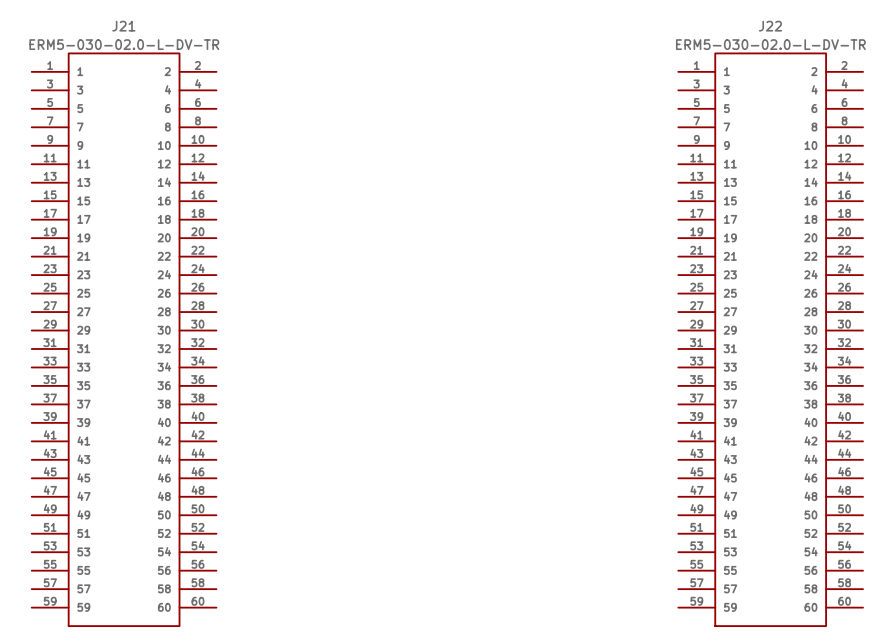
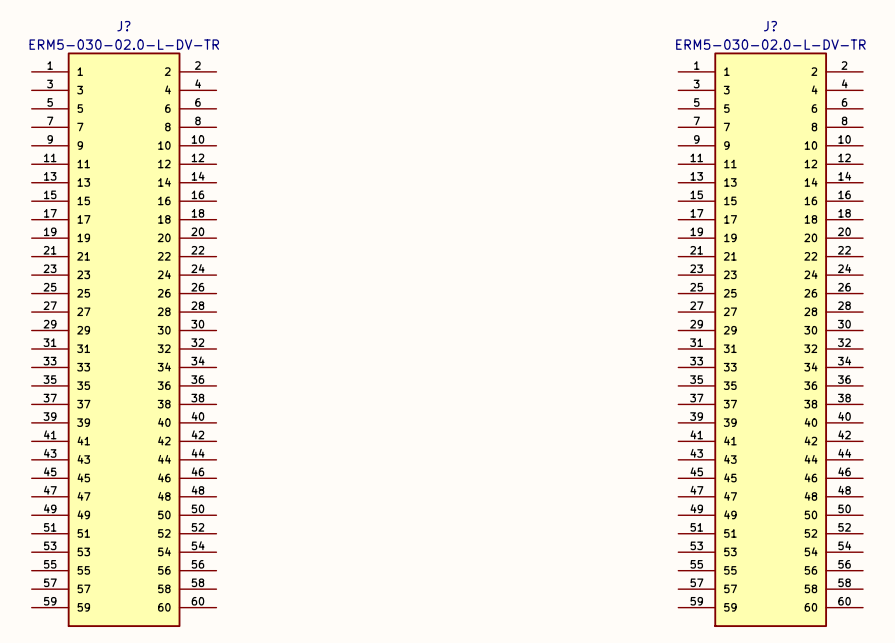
J21 name: J21 (123, 26) -> J? (123, 26)
J22 name: J22 (770, 26) -> J? (770, 26)

